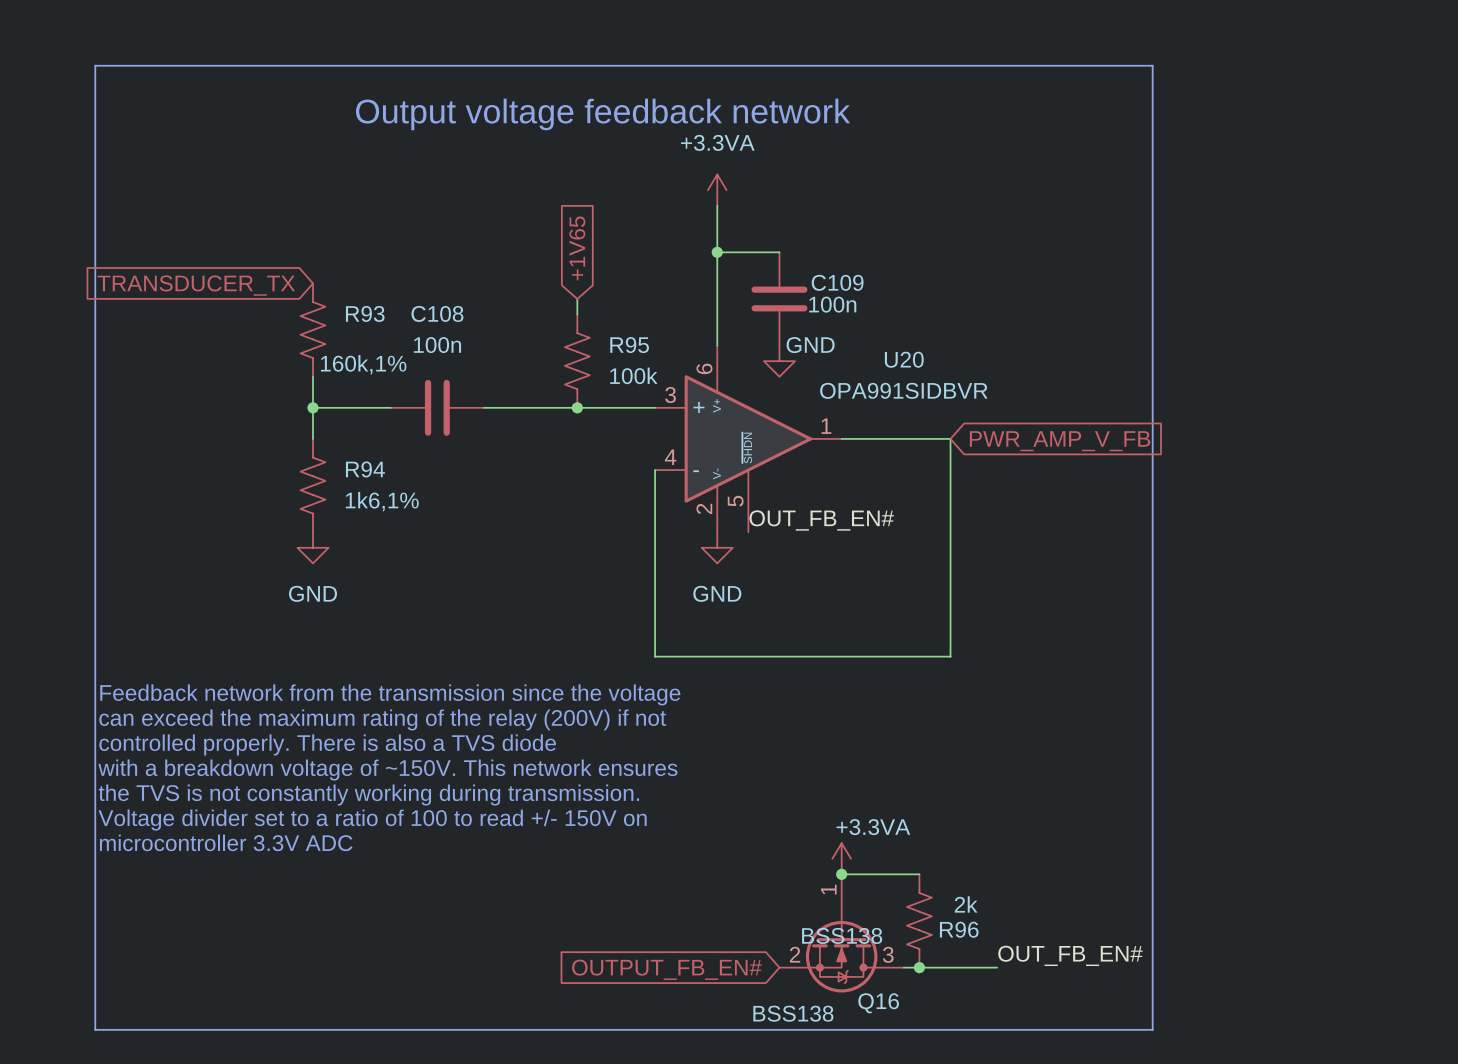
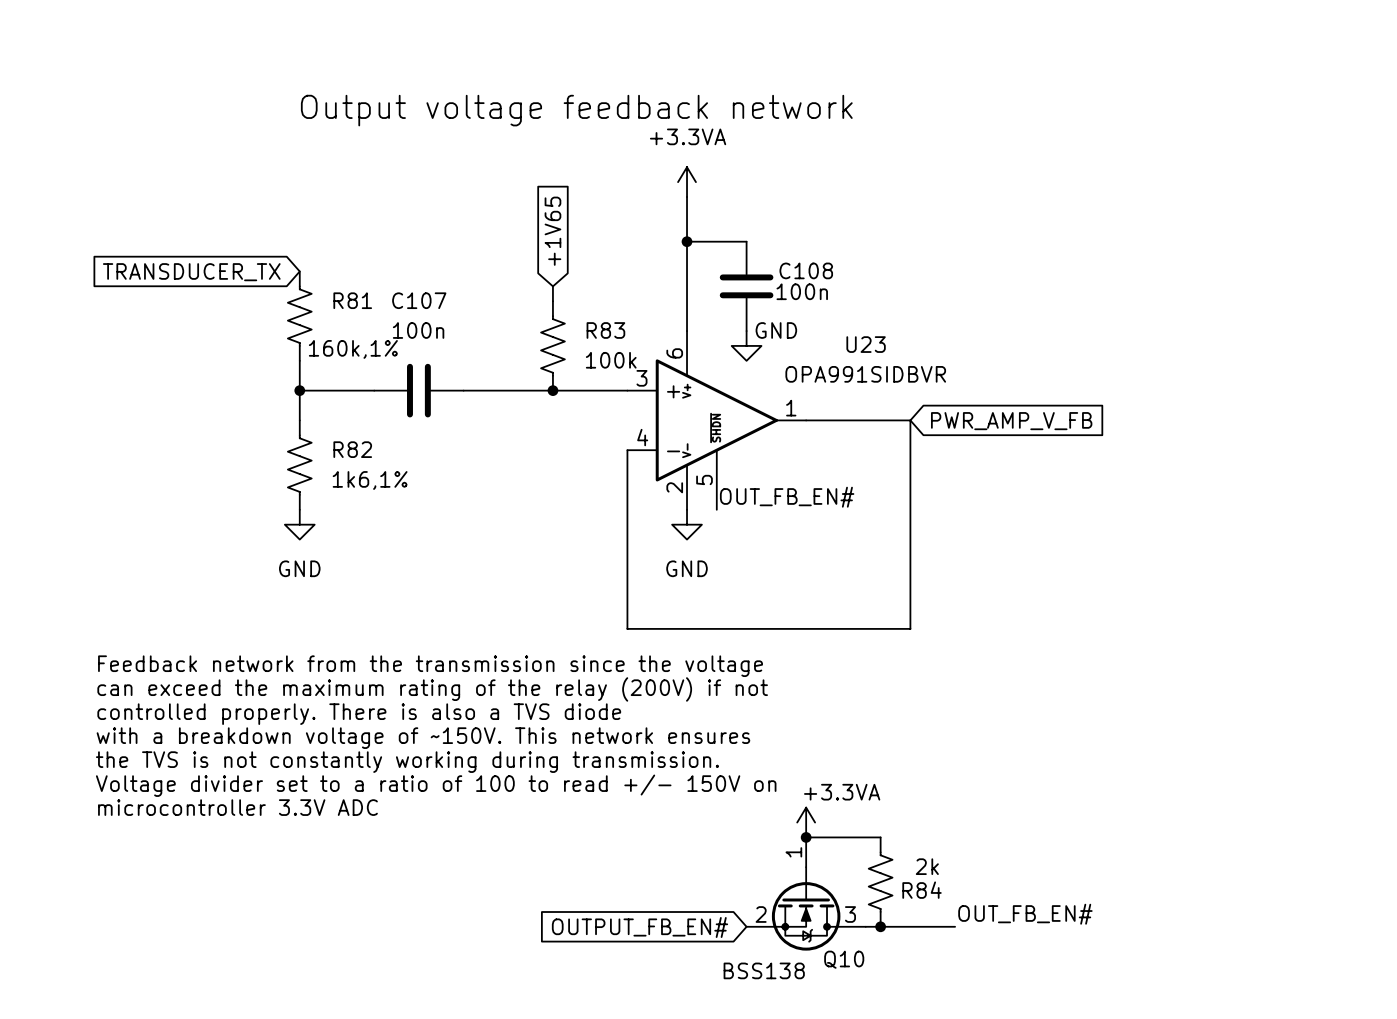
line: (95, 65) (1152, 65) (1152, 1029) (95, 1029) (95, 65) -> none
C109 name: C109 (837, 282) -> C108 (806, 270)
R93 name: R93 (365, 313) -> R81 (352, 300)
C108 name: C108 (437, 313) -> C107 (419, 300)
R95 name: R95 (629, 345) -> R83 (605, 330)
U20 name: U20 (904, 359) -> U23 (866, 344)
R94 name: R94 (365, 469) -> R82 (352, 449)
R96 name: R96 (959, 929) -> R84 (922, 890)
Q16 text: BSS138 (842, 935) -> none
Q16 name: Q16 (878, 1003) -> Q10 (844, 959)

